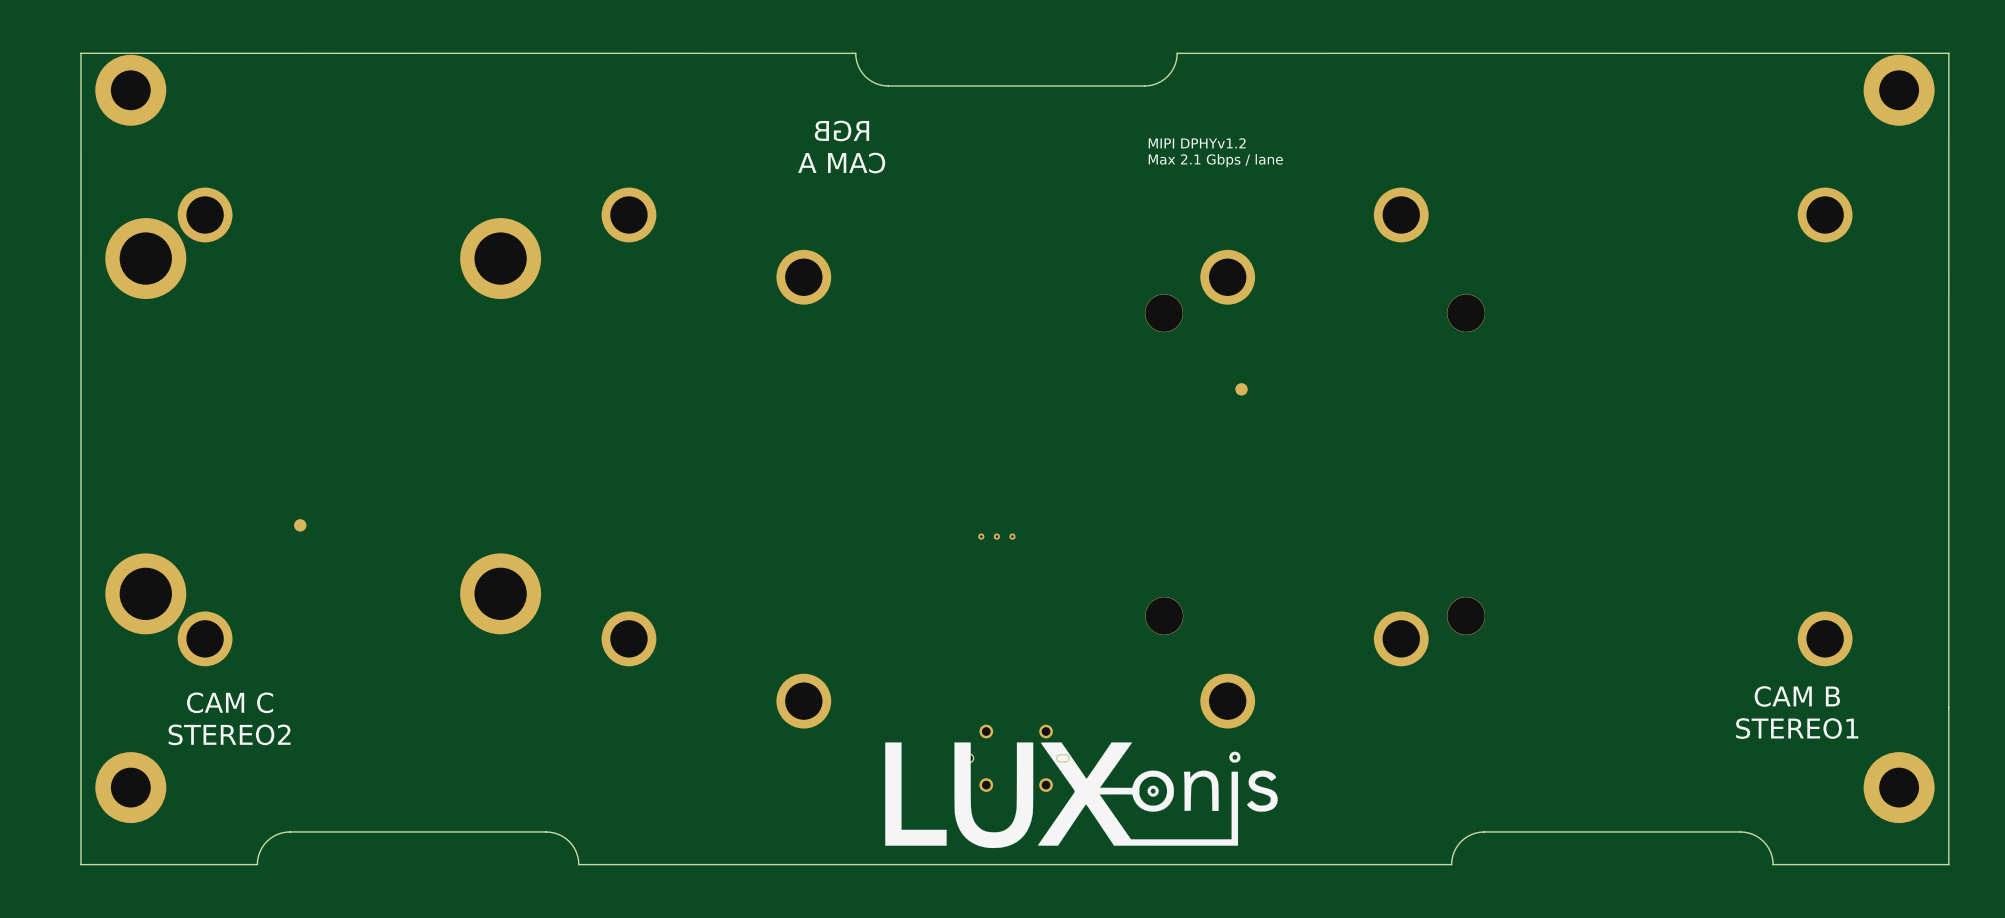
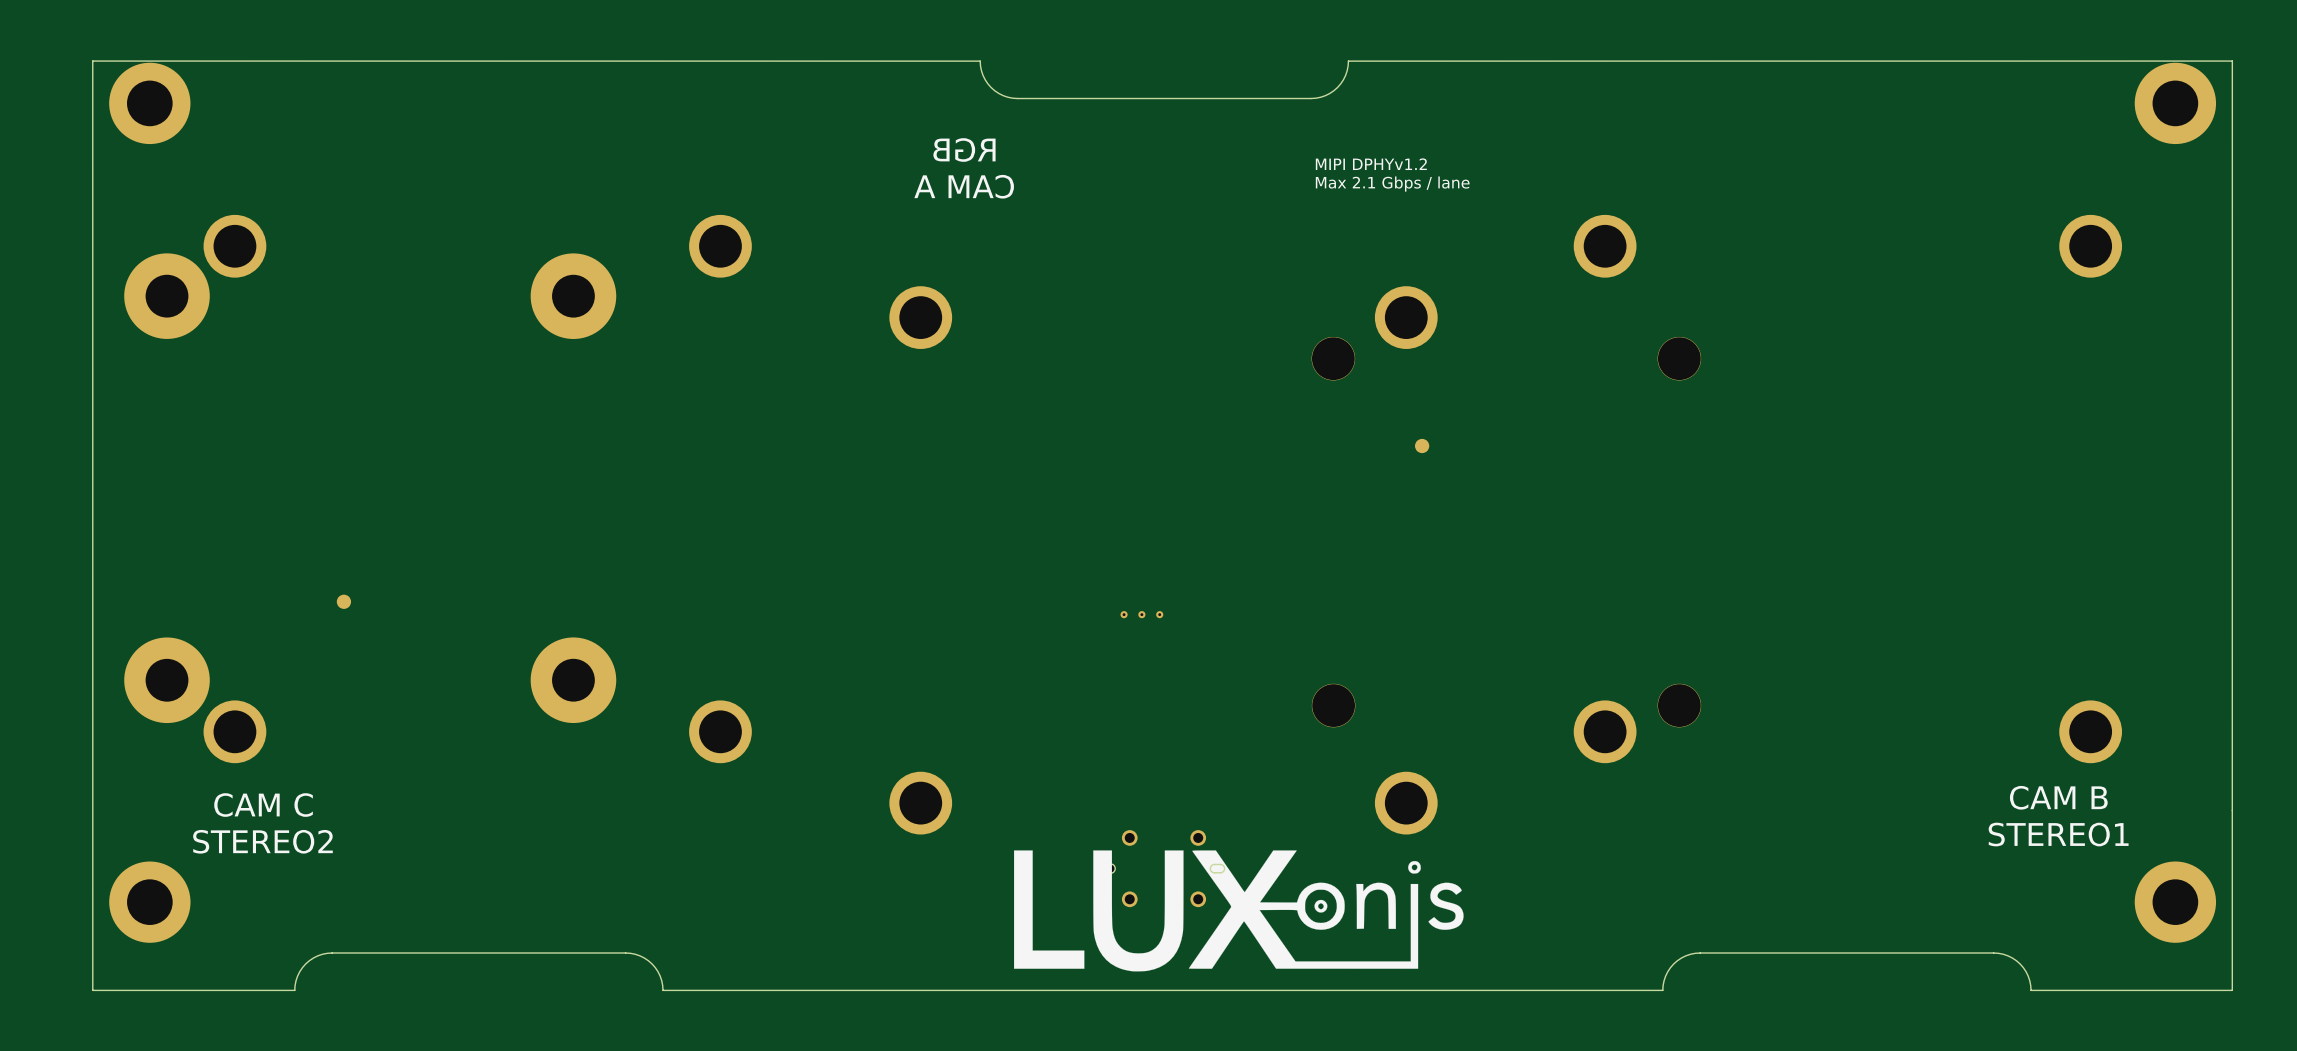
part footprint: [105, 218, 187, 300] -> [124, 253, 210, 339]
part footprint: [460, 218, 542, 300] -> [530, 253, 617, 339]
part footprint: [105, 553, 187, 635] -> [124, 637, 210, 724]
part footprint: [460, 553, 542, 635] -> [530, 637, 617, 724]

